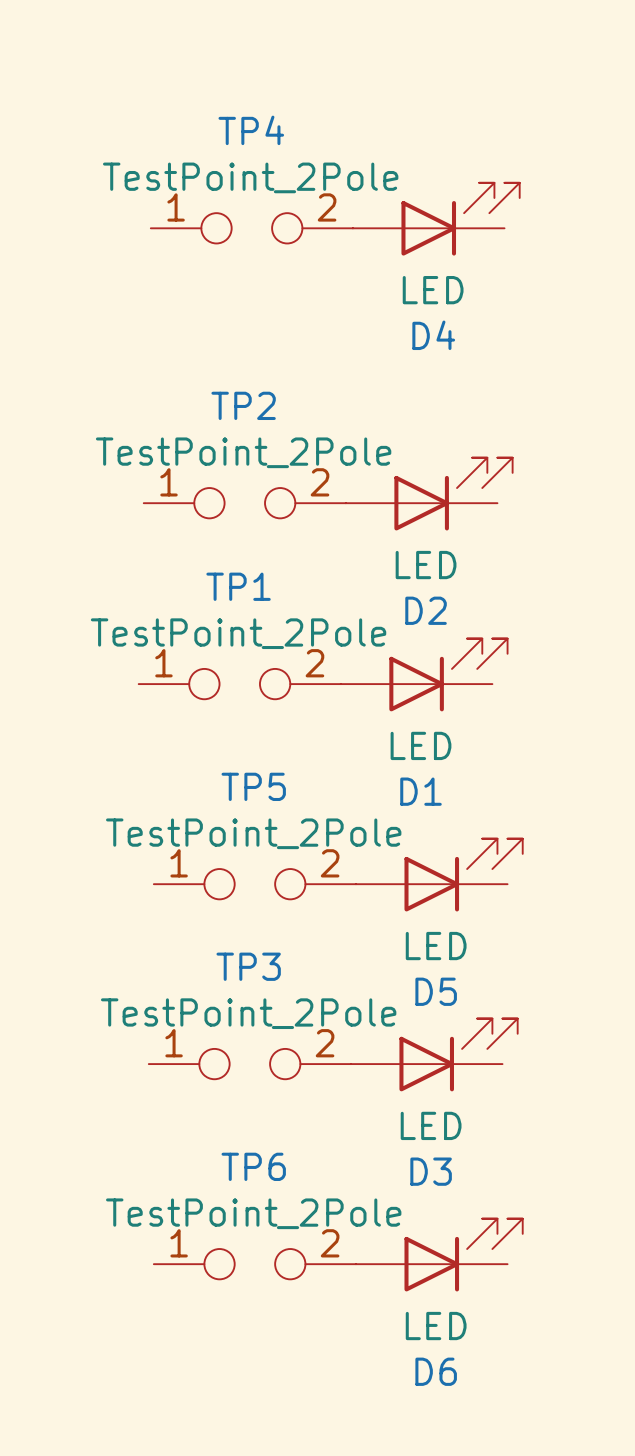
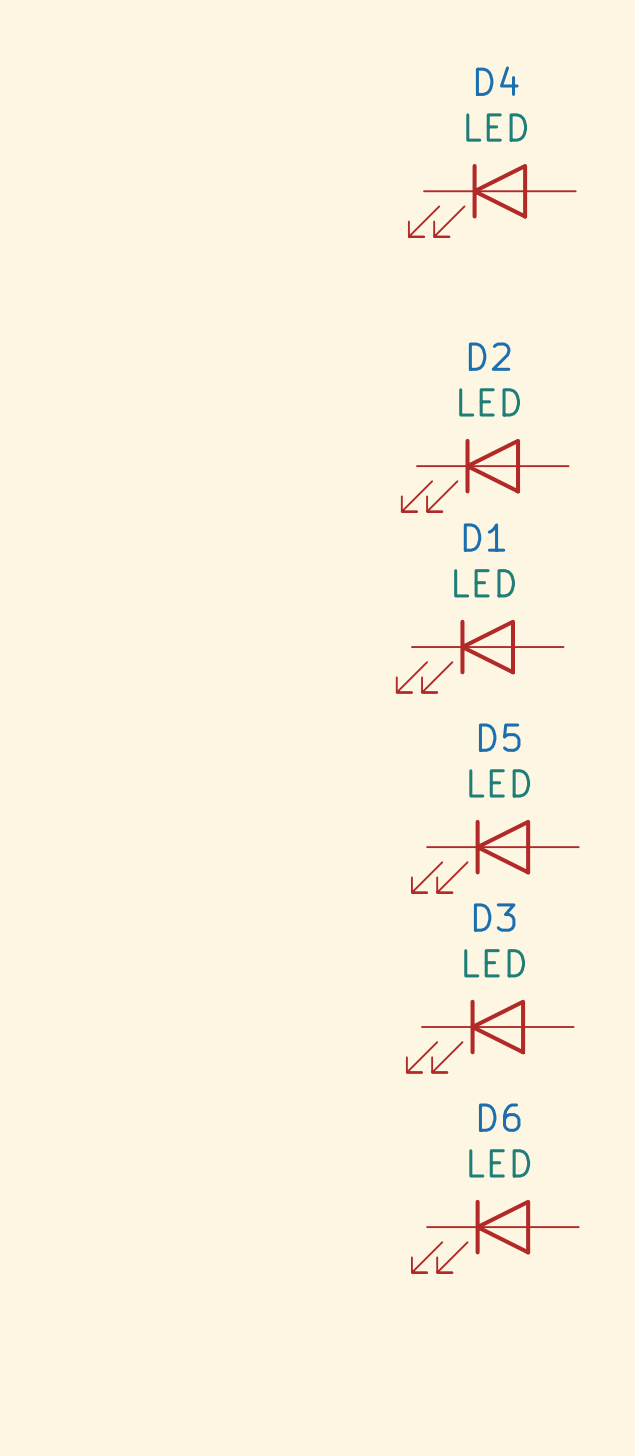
D4 rotation: 0° (460, 219) -> 180° (468, 200)
TP4: TestPoint_2Pole (251, 228) -> none
D2 rotation: 0° (453, 494) -> 180° (460, 475)
TP2: TestPoint_2Pole (244, 503) -> none
D1 rotation: 0° (448, 674) -> 180° (455, 656)
TP1: TestPoint_2Pole (239, 684) -> none
D5 rotation: 0° (463, 875) -> 180° (471, 856)
TP5: TestPoint_2Pole (254, 884) -> none
D3 rotation: 0° (458, 1054) -> 180° (466, 1036)
TP3: TestPoint_2Pole (249, 1064) -> none
D6 rotation: 0° (463, 1255) -> 180° (471, 1236)
TP6: TestPoint_2Pole (254, 1264) -> none

